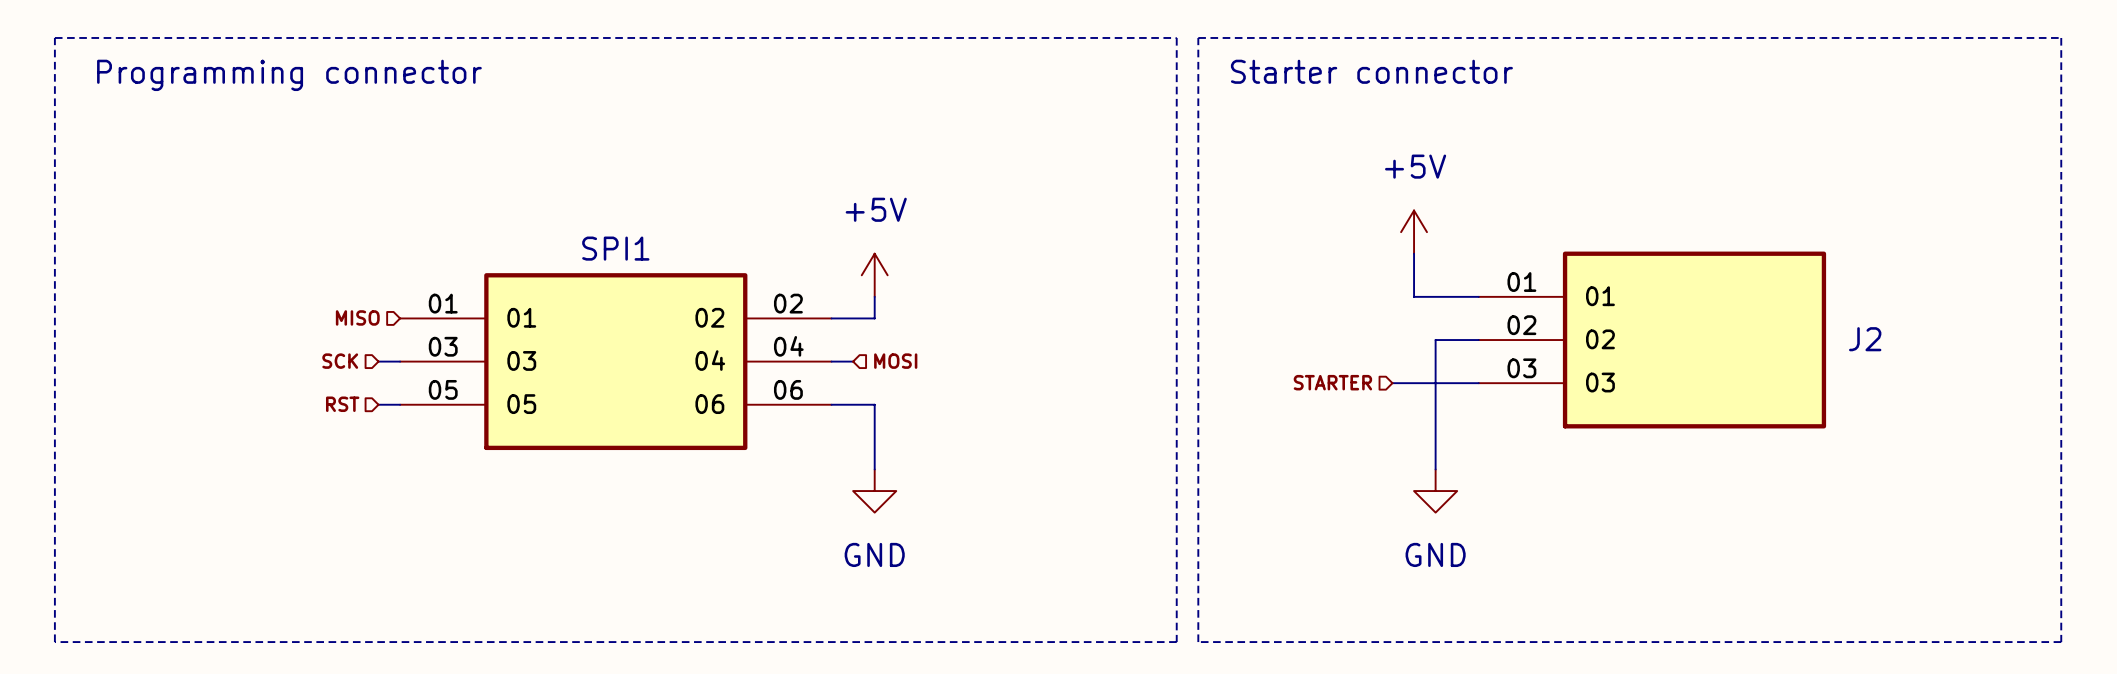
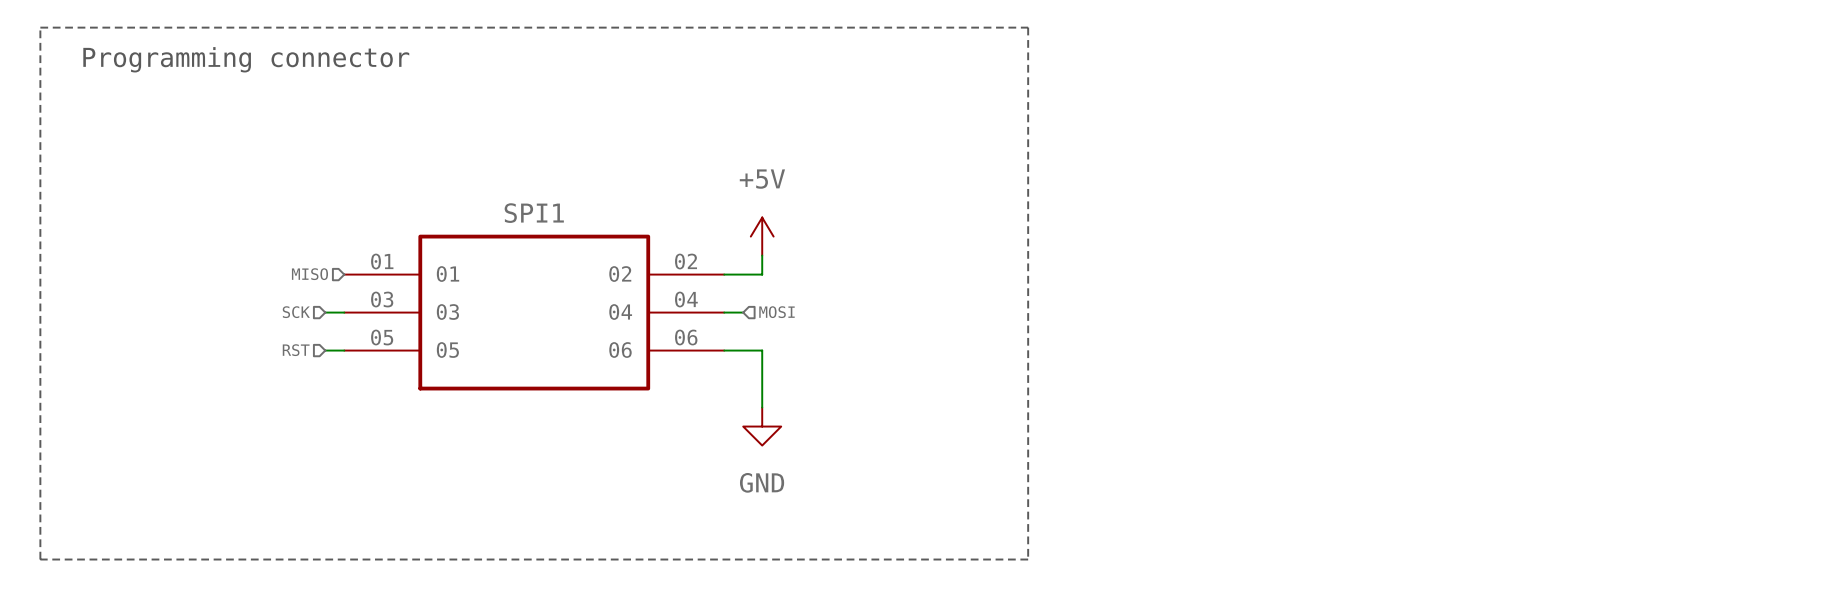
line: (1198, 37) (2061, 37) (2061, 642) (1198, 642) (1198, 37) -> none
text: Starter connector (1371, 71) -> none
power symbol: +5V (1414, 232) -> none
wire: (1414, 253) (1414, 296) (1478, 296) -> none
wire: (1478, 340) (1435, 340) (1435, 469) -> none
J2: (1652, 340) -> none
hierarchical label: STARTER (1332, 382) -> none
wire: (1392, 383) (1478, 383) -> none
power symbol: GND (1435, 491) -> none

